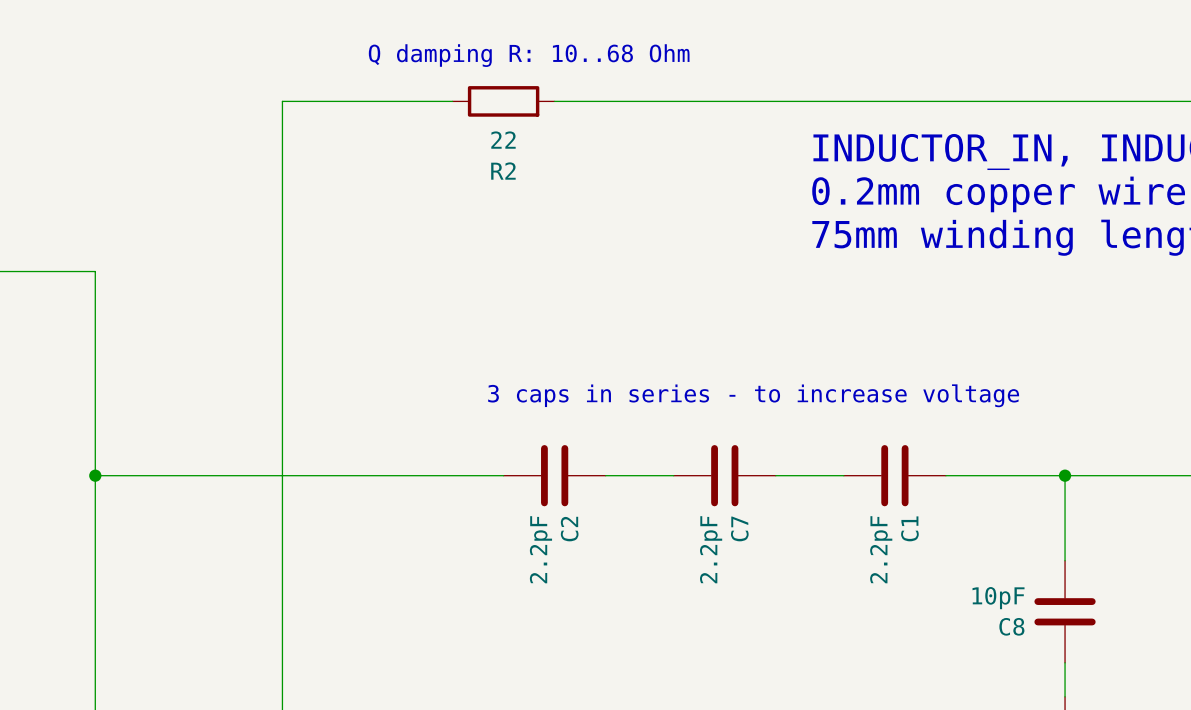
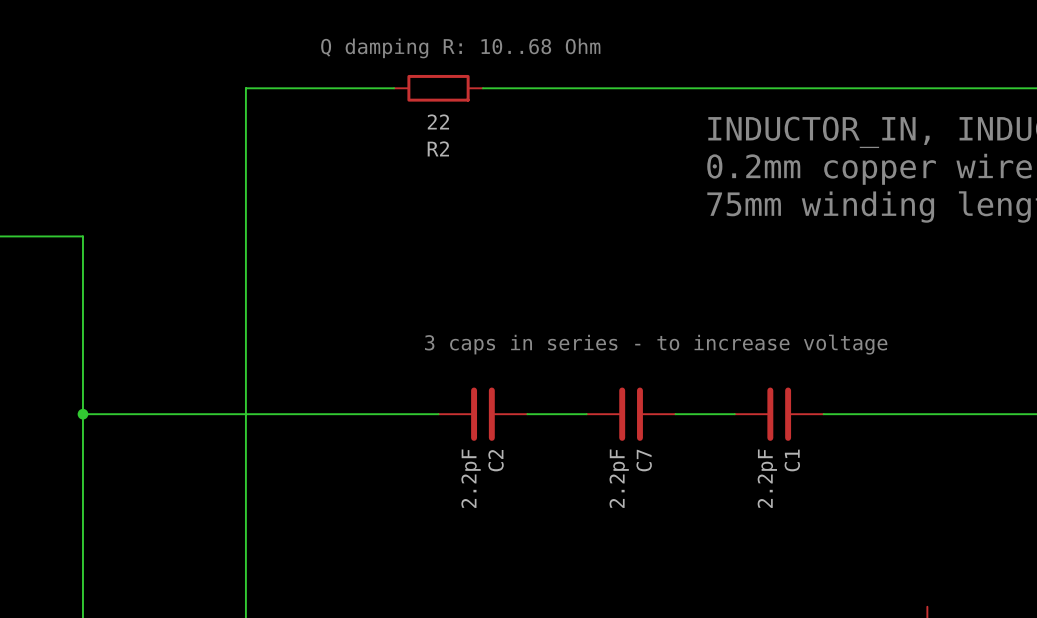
wire: (1065, 475) (1065, 560) -> none
junction: (1065, 475) -> none
C8: 10pF (1065, 611) -> none
wire: (1065, 662) (1065, 696) -> none

